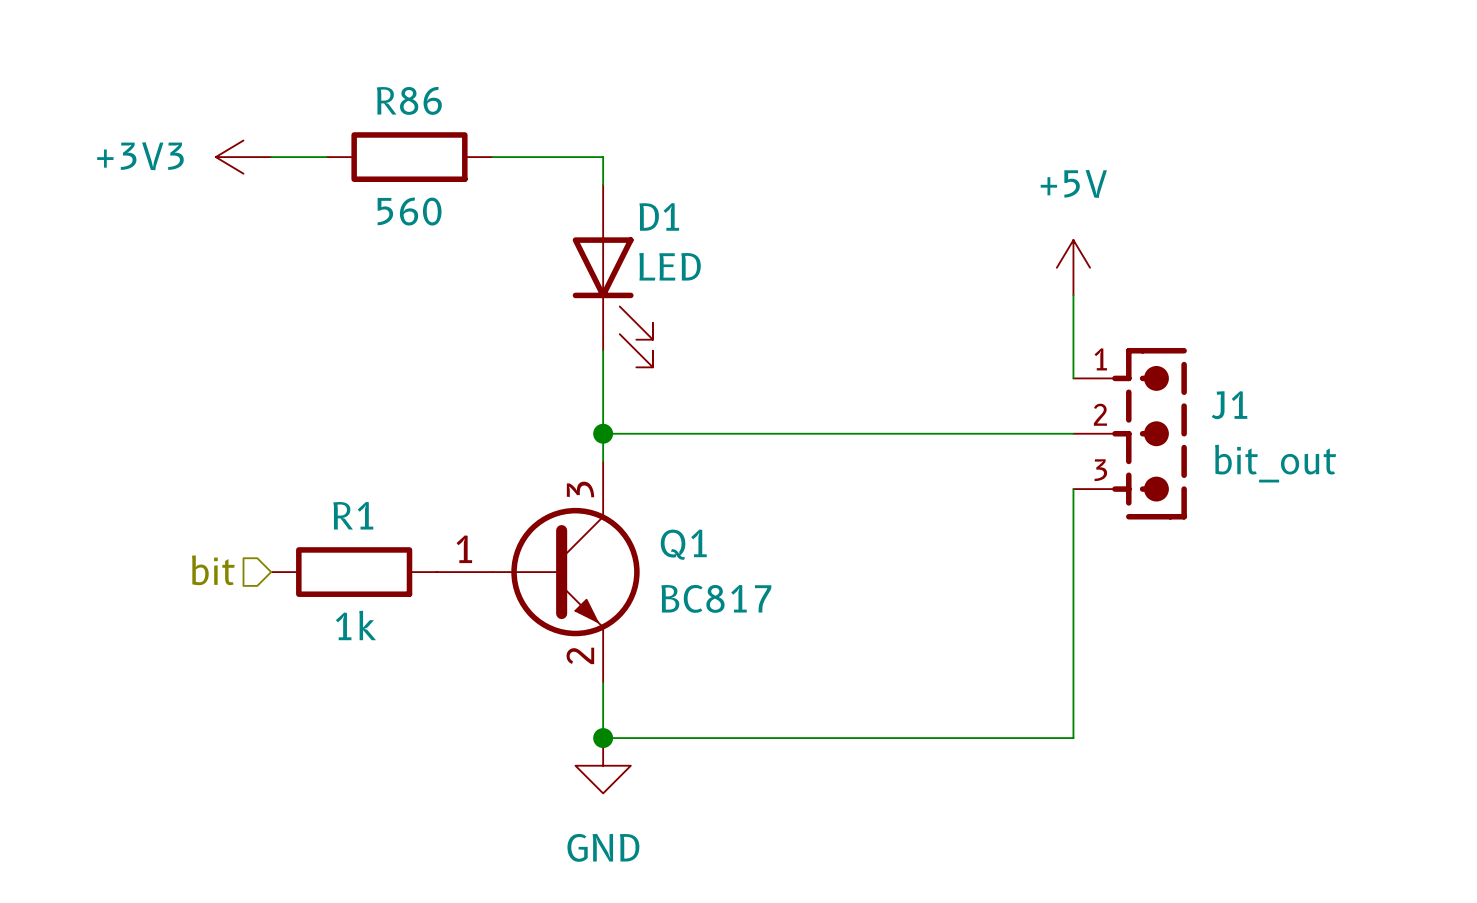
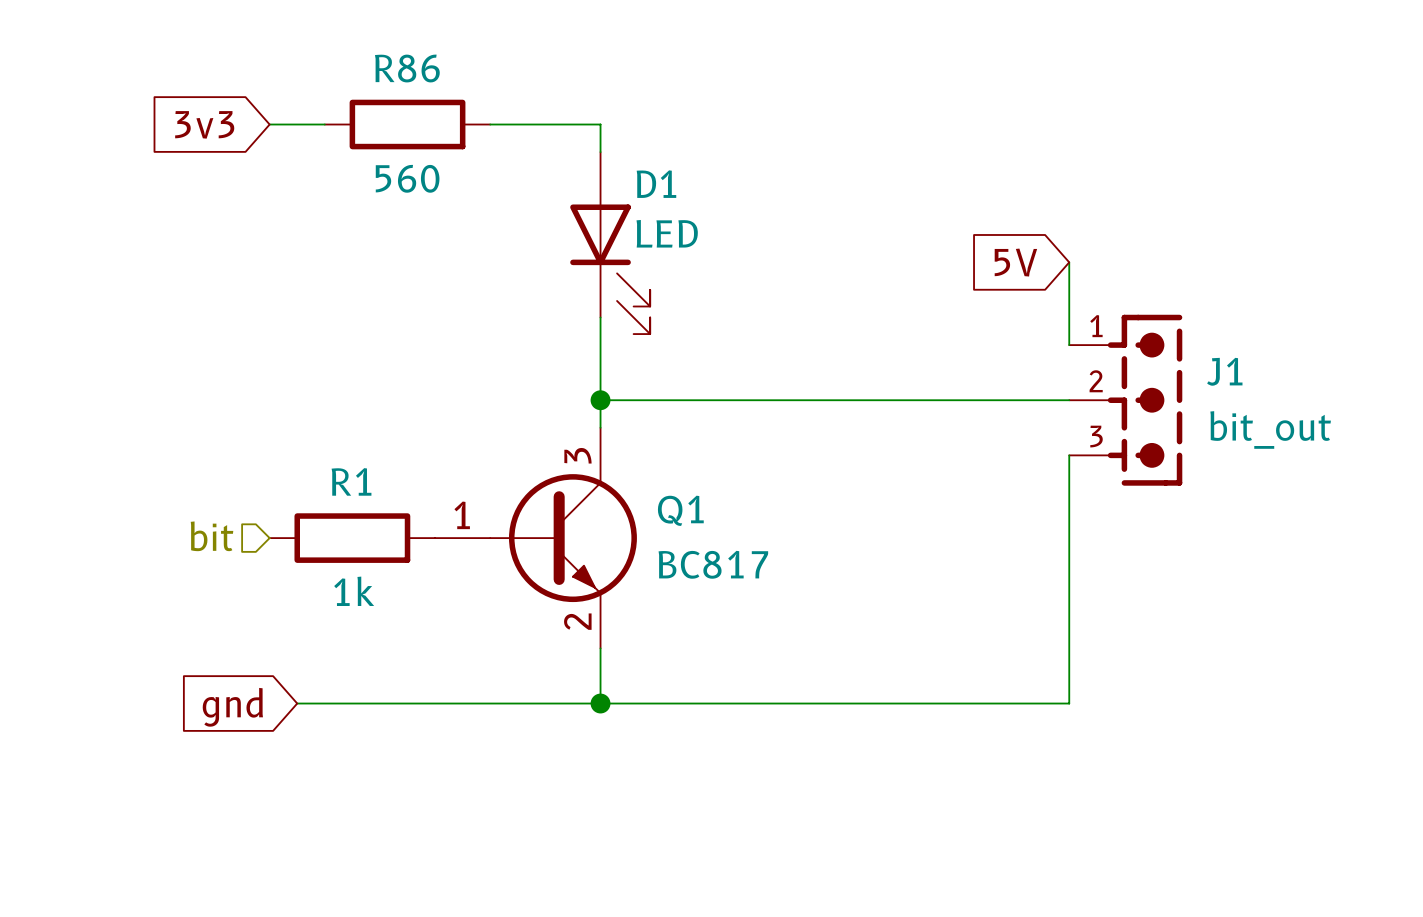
global label: none -> 3v3 (204, 124)
power symbol: +3V3 (243, 157) -> none
power symbol: +5V (1073, 267) -> none
global label: none -> 5V (1015, 262)
wire: none -> (297, 703) (600, 703)
global label: none -> gnd (232, 707)
power symbol: GND (603, 765) -> none

